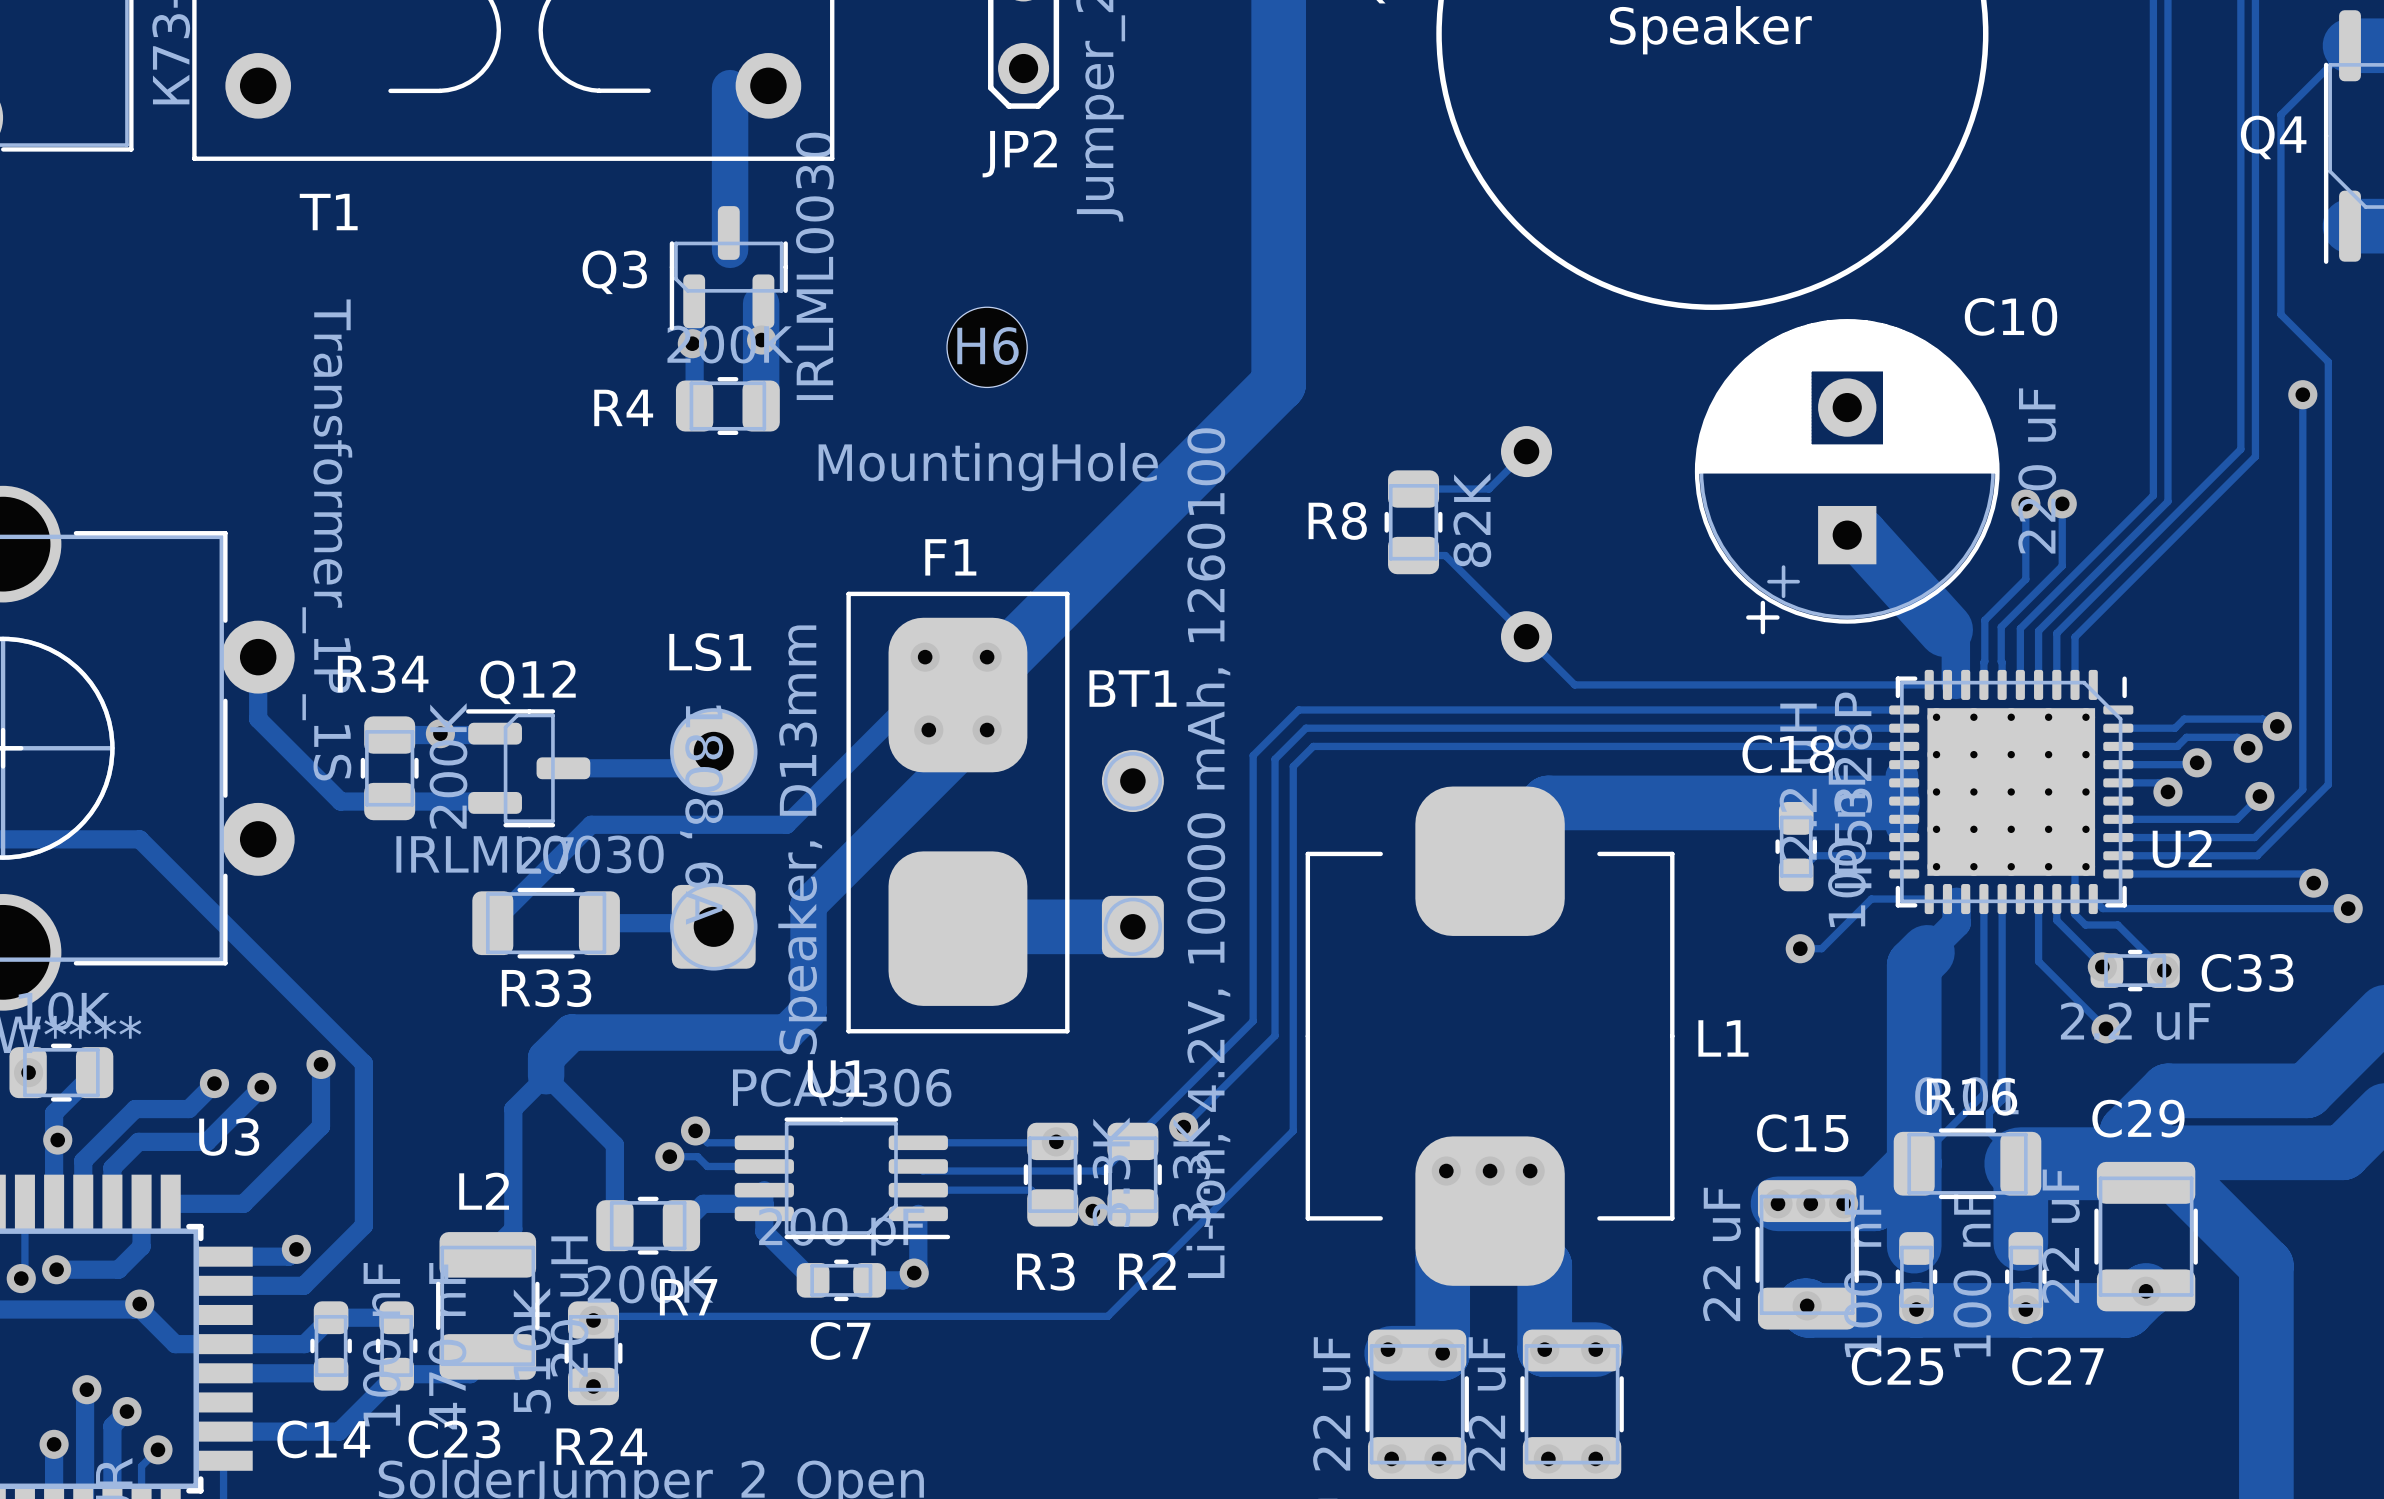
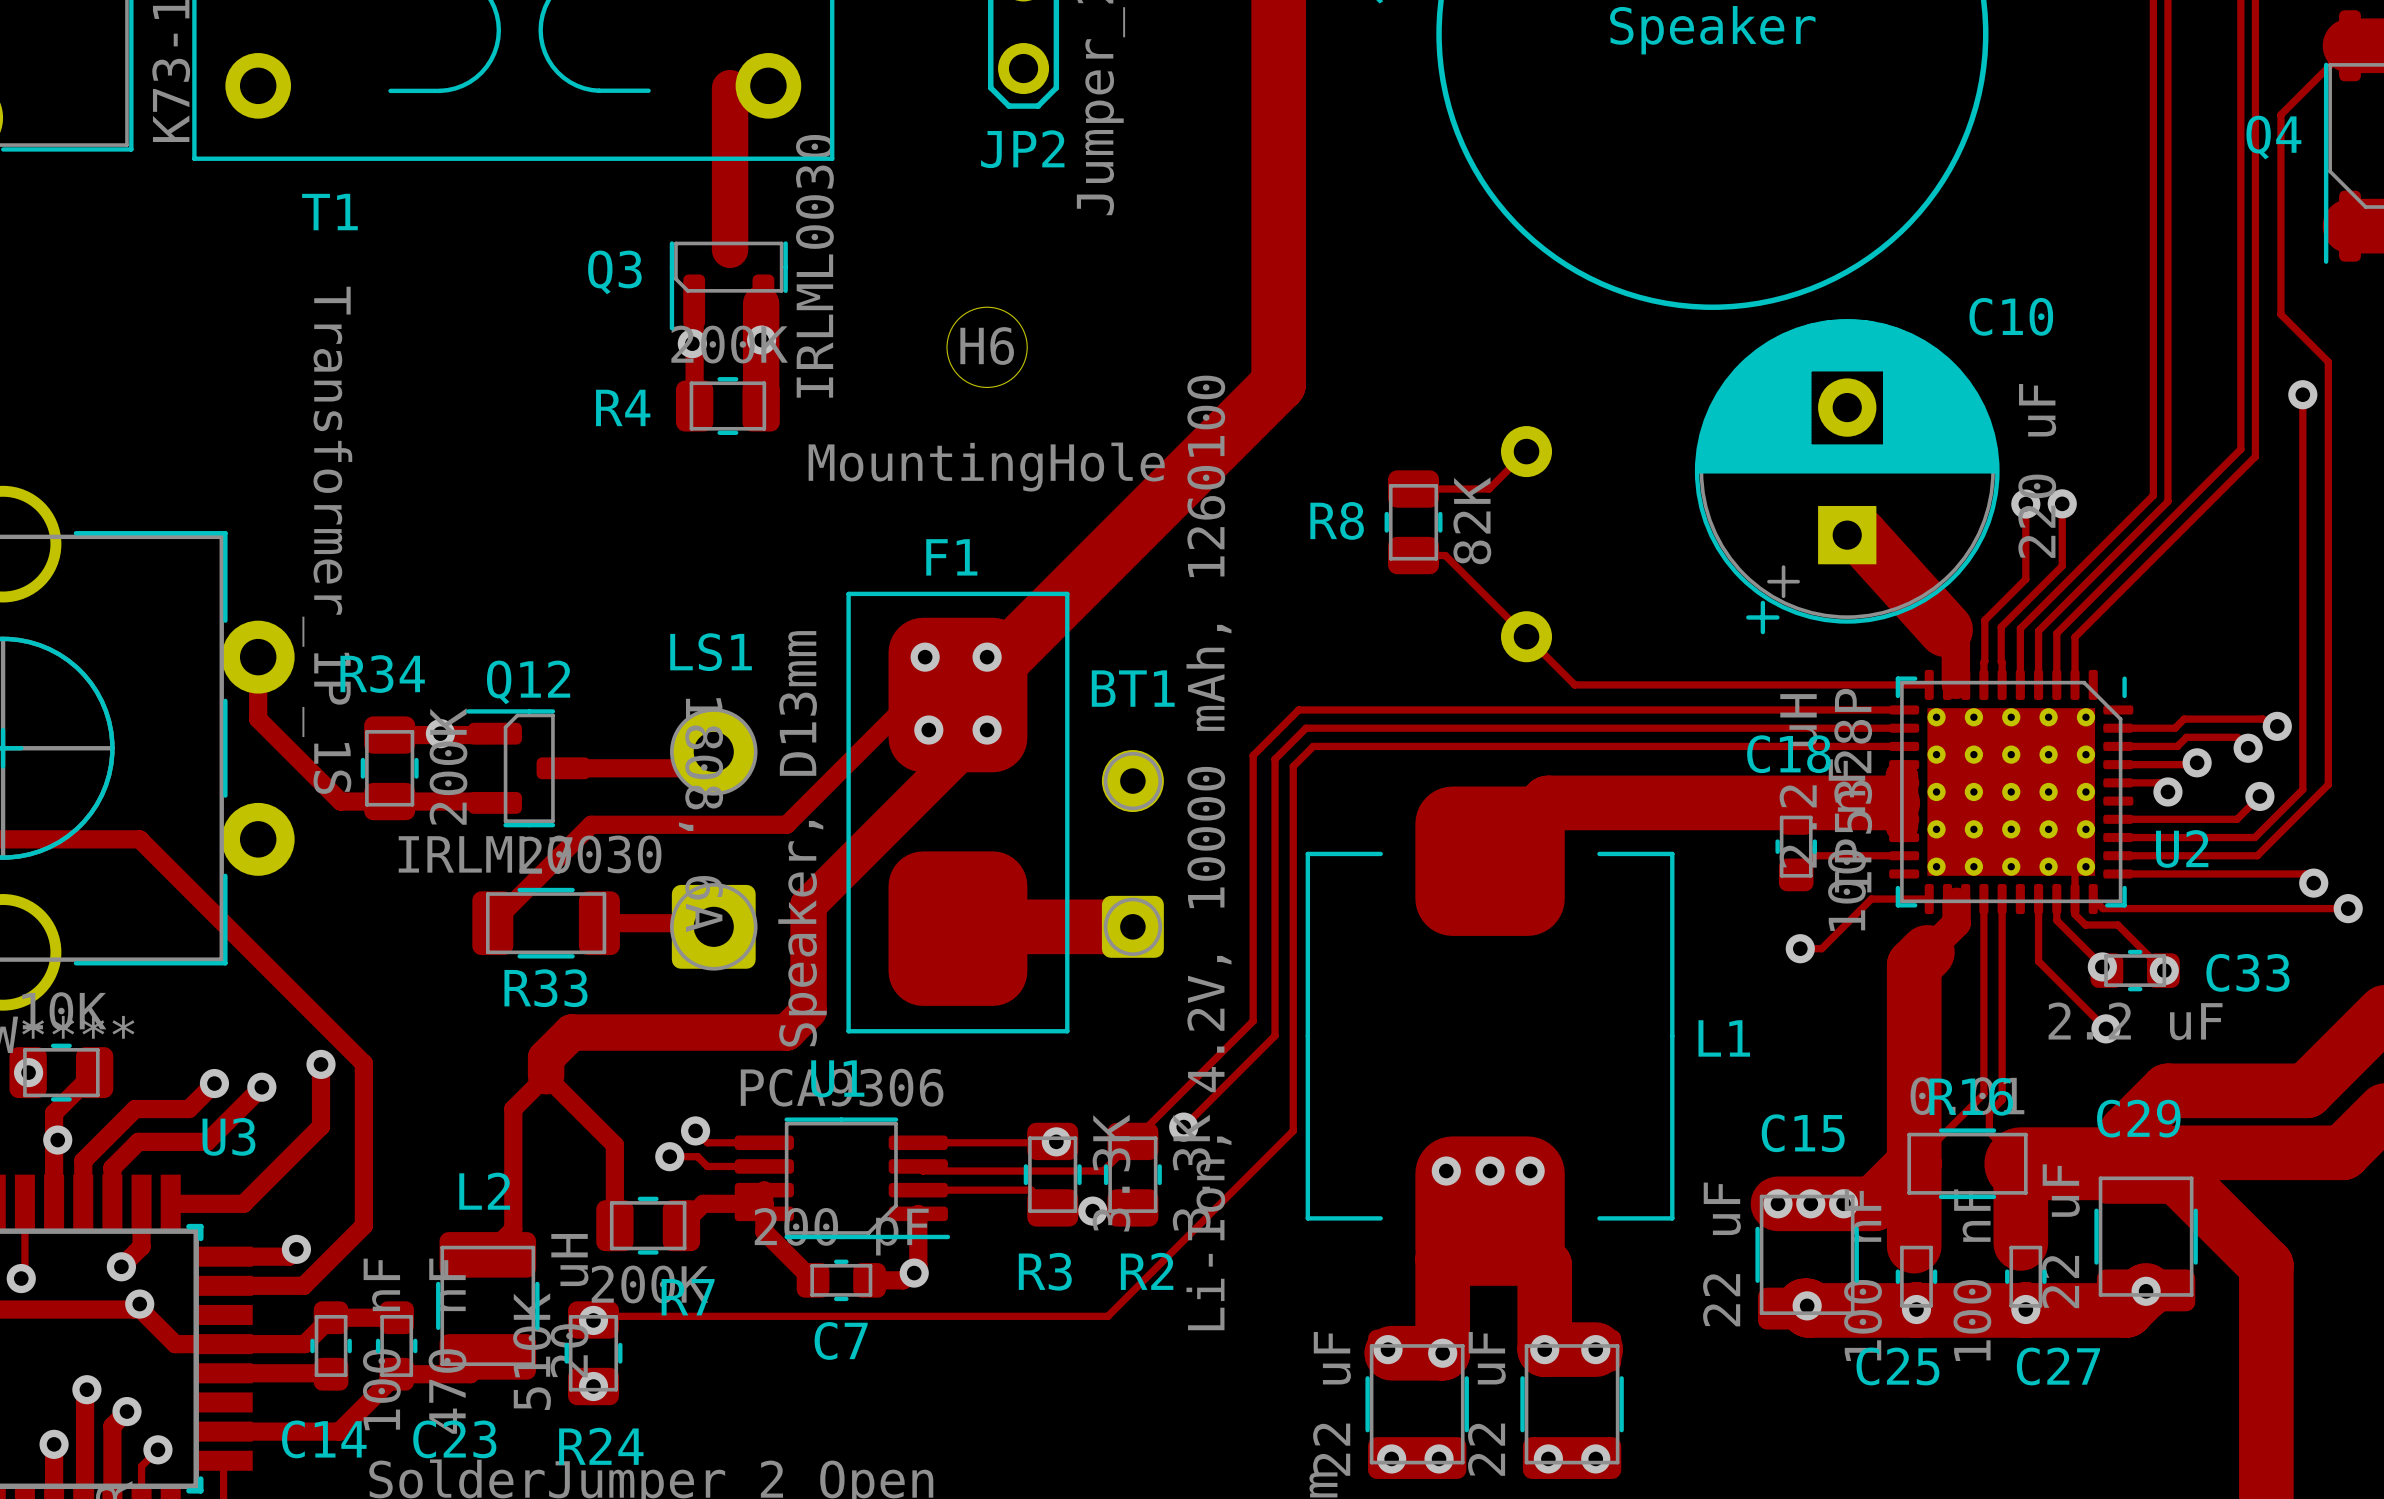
track: (121, 1266) (118, 1269) (56, 1269) -> none
via position: (56, 1269) -> (121, 1266)

